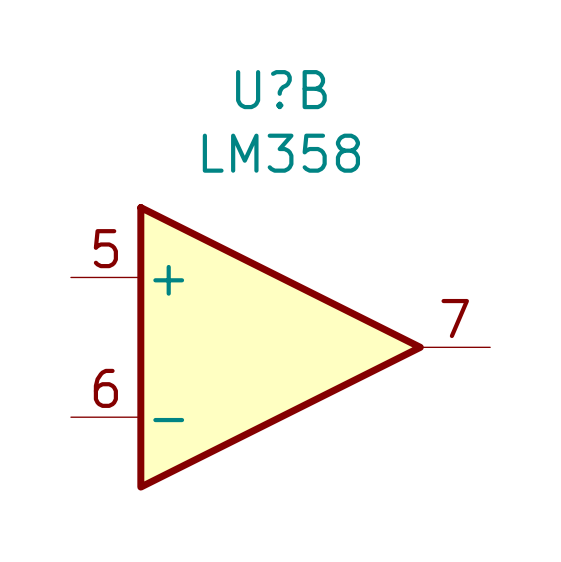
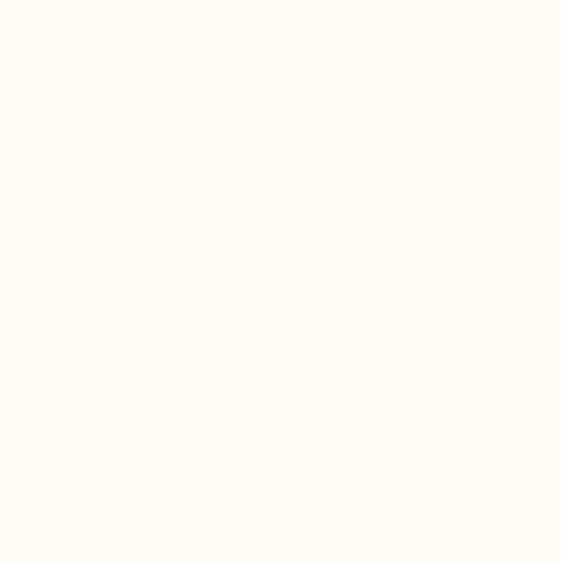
U?B: LM358 (280, 347) -> none

